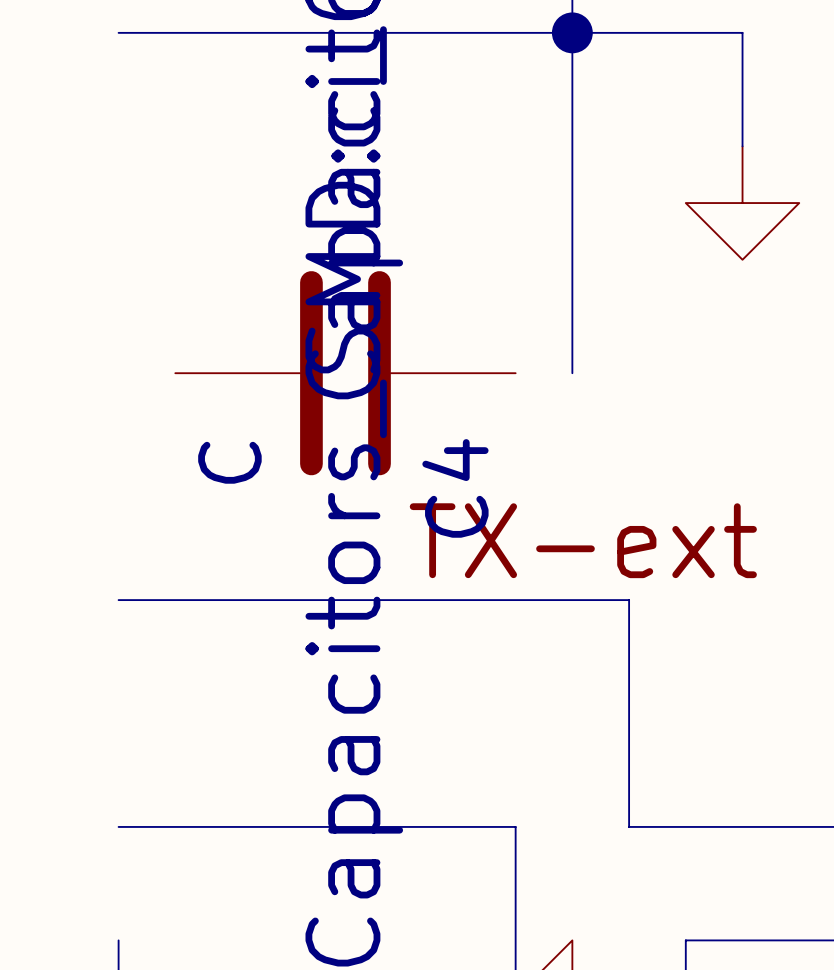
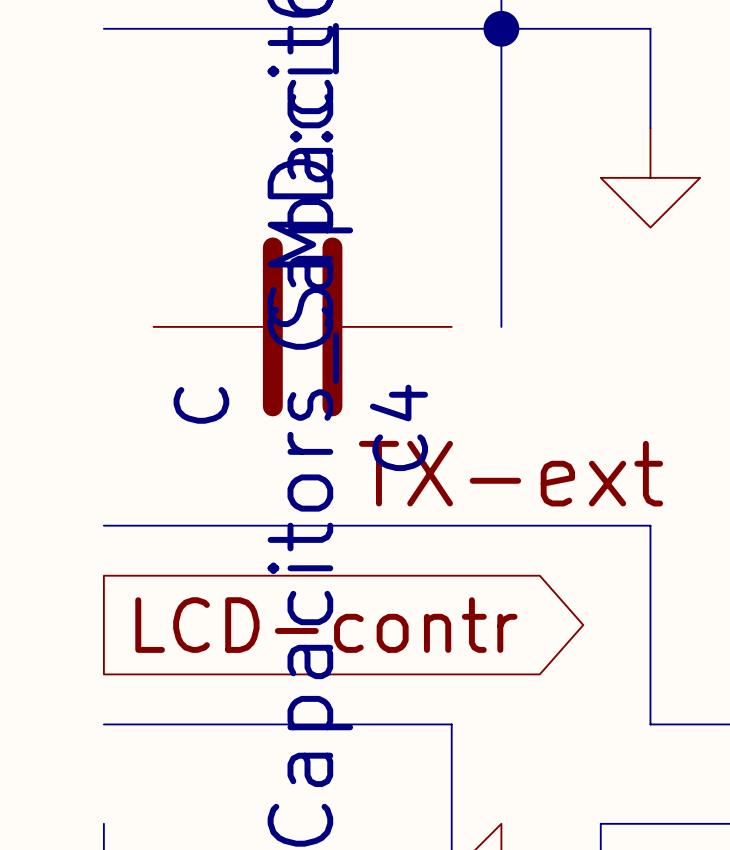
wire: (629, 600) (629, 826) (742, 826) -> (551, 525) (650, 525) (650, 724)
global label: none -> LCD-contr (326, 625)

